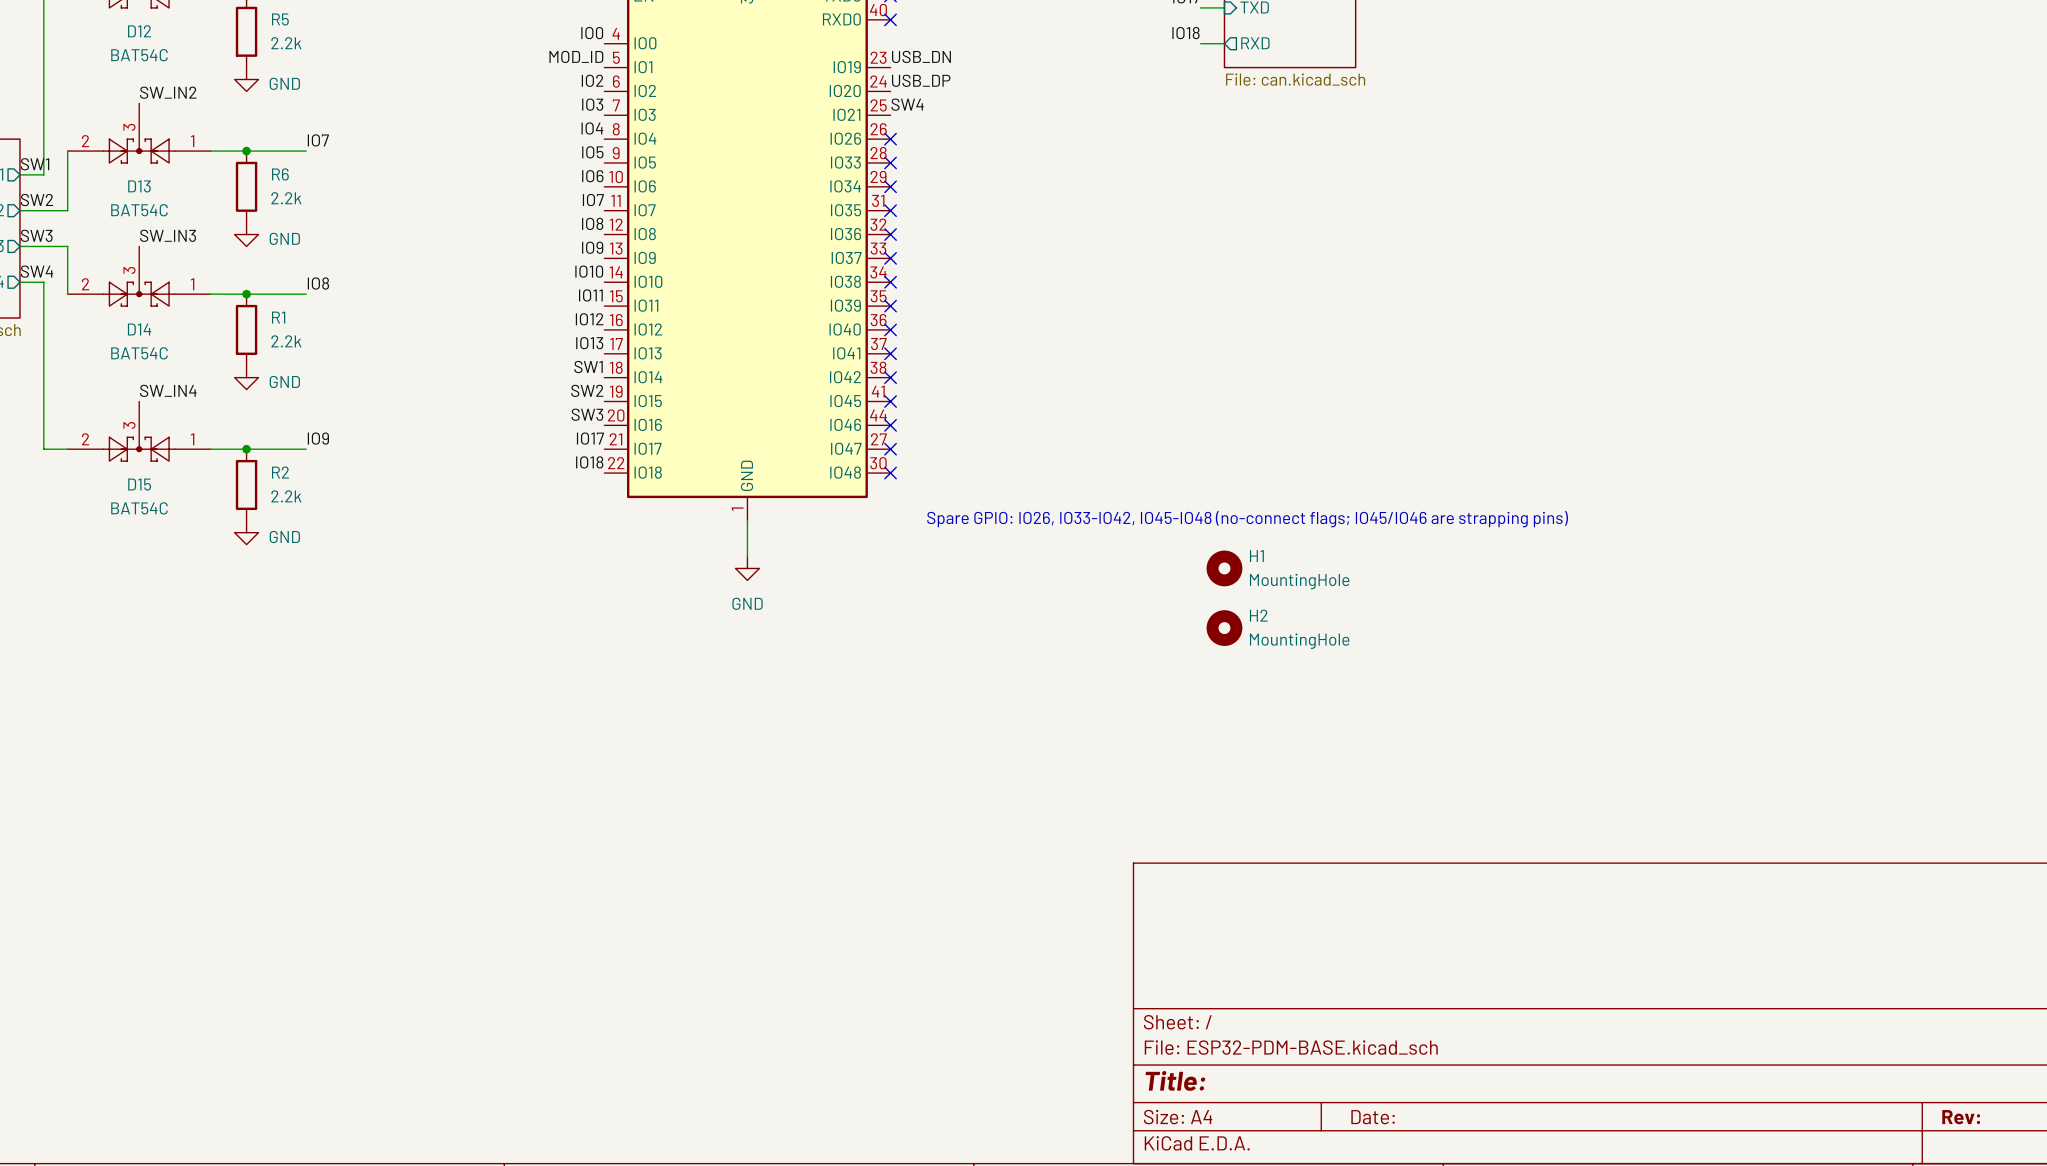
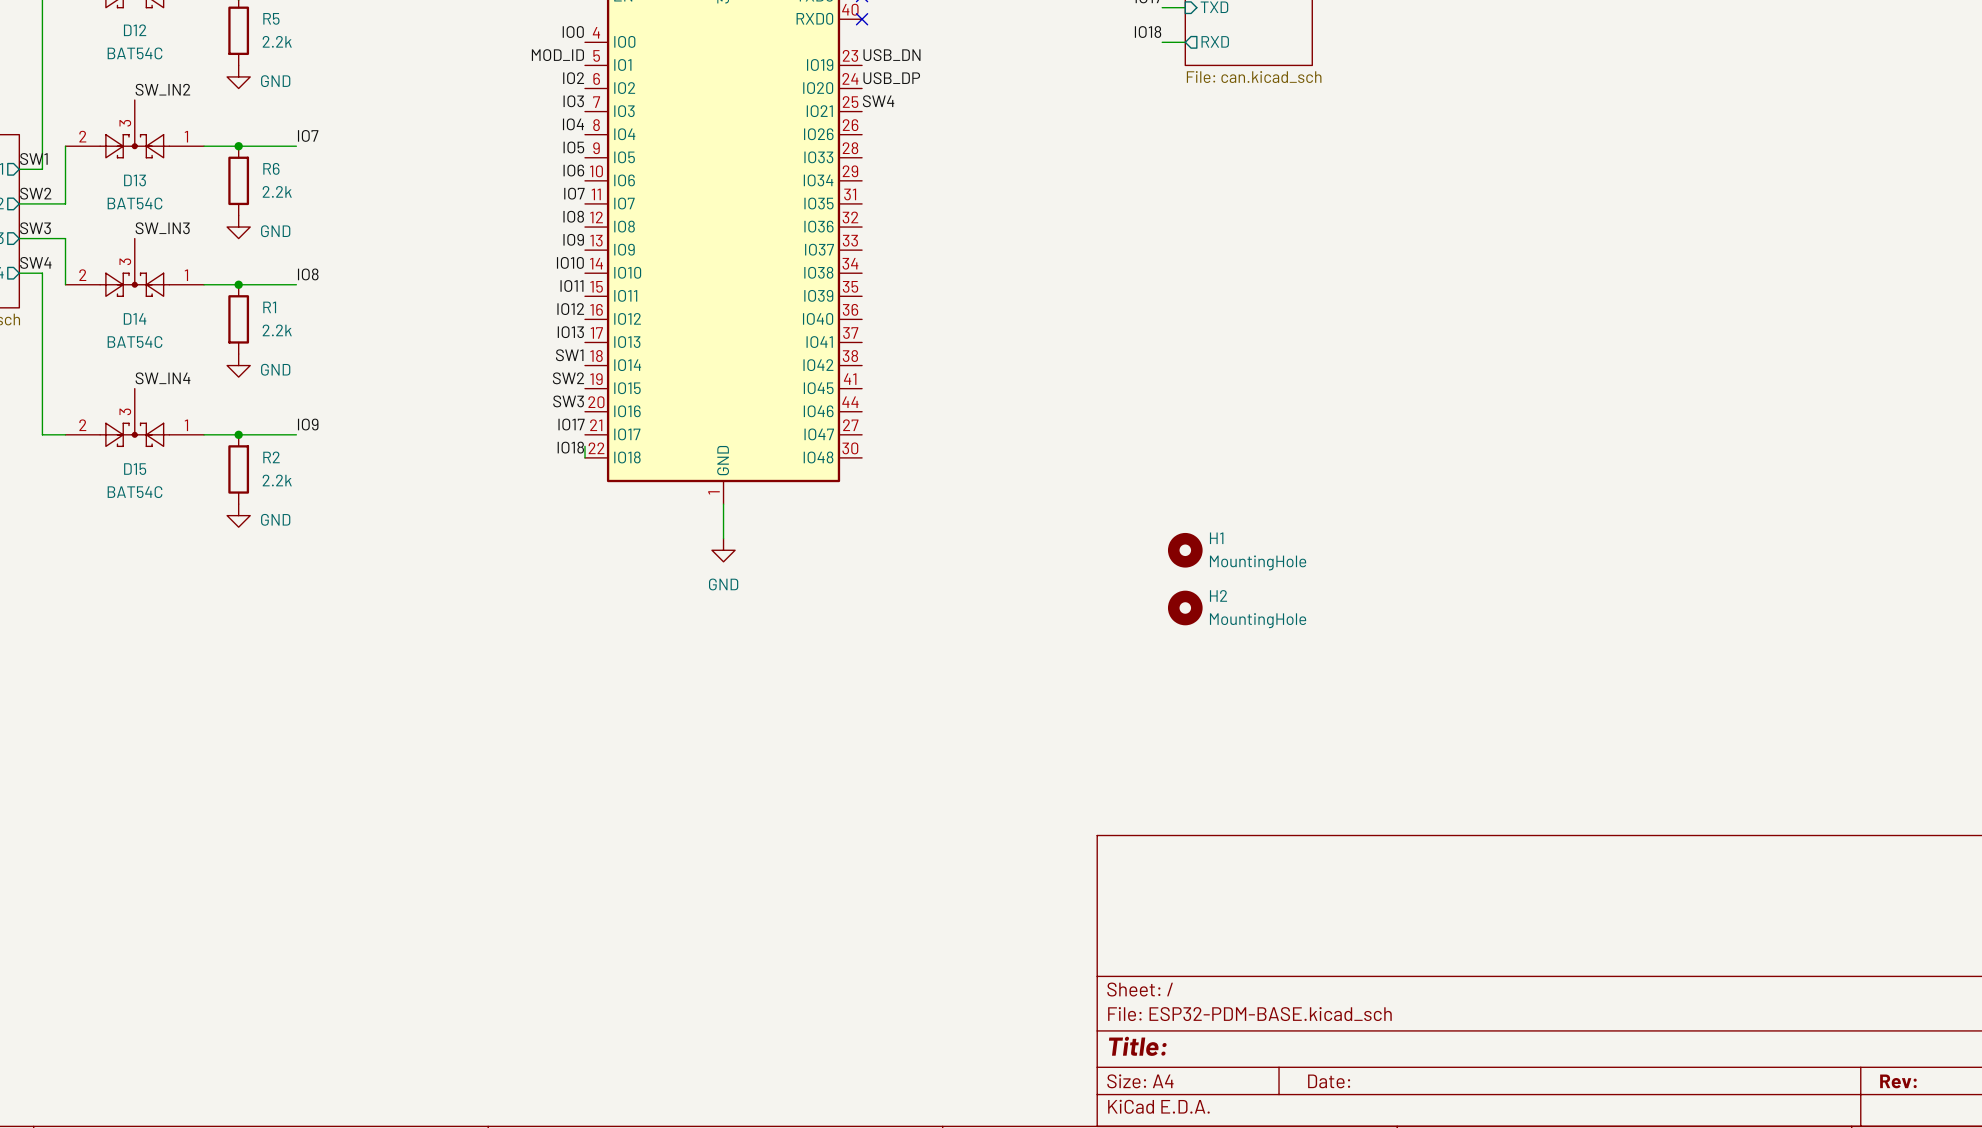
no-connect mark: (890, 139) -> none
no-connect mark: (890, 162) -> none
no-connect mark: (890, 186) -> none
no-connect mark: (890, 210) -> none
no-connect mark: (890, 234) -> none
no-connect mark: (890, 258) -> none
no-connect mark: (890, 282) -> none
no-connect mark: (890, 306) -> none
no-connect mark: (890, 329) -> none
no-connect mark: (890, 353) -> none
no-connect mark: (890, 377) -> none
no-connect mark: (890, 401) -> none
no-connect mark: (890, 425) -> none
no-connect mark: (890, 449) -> none
wire: none -> (584, 446) (584, 457)
no-connect mark: (890, 473) -> none
text: Spare GPIO: IO26, IO33-IO42, IO45-IO48 (no-connect flags; IO45/IO46 are strapping pins) (1247, 519) -> none

